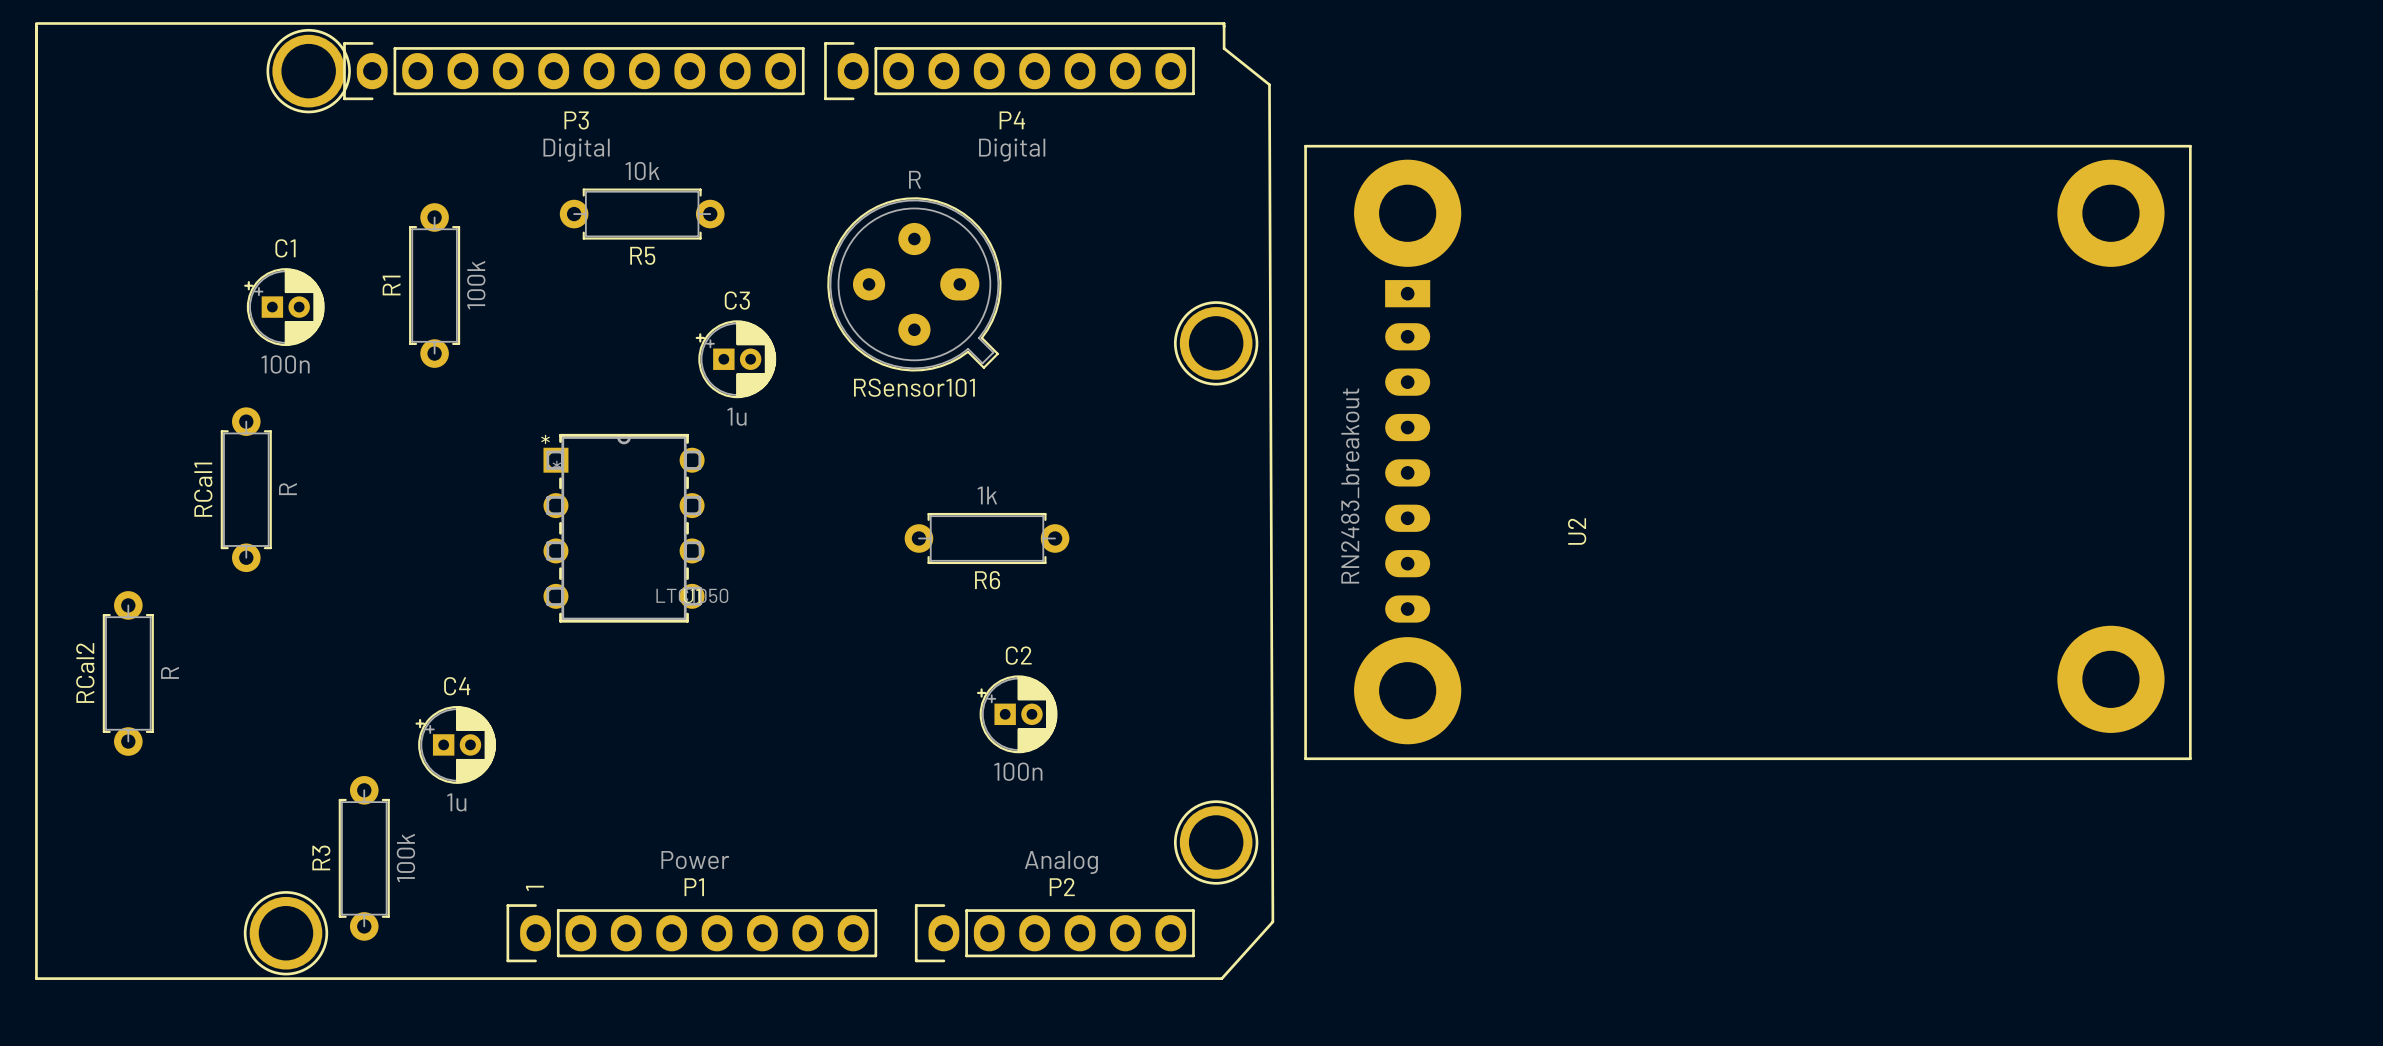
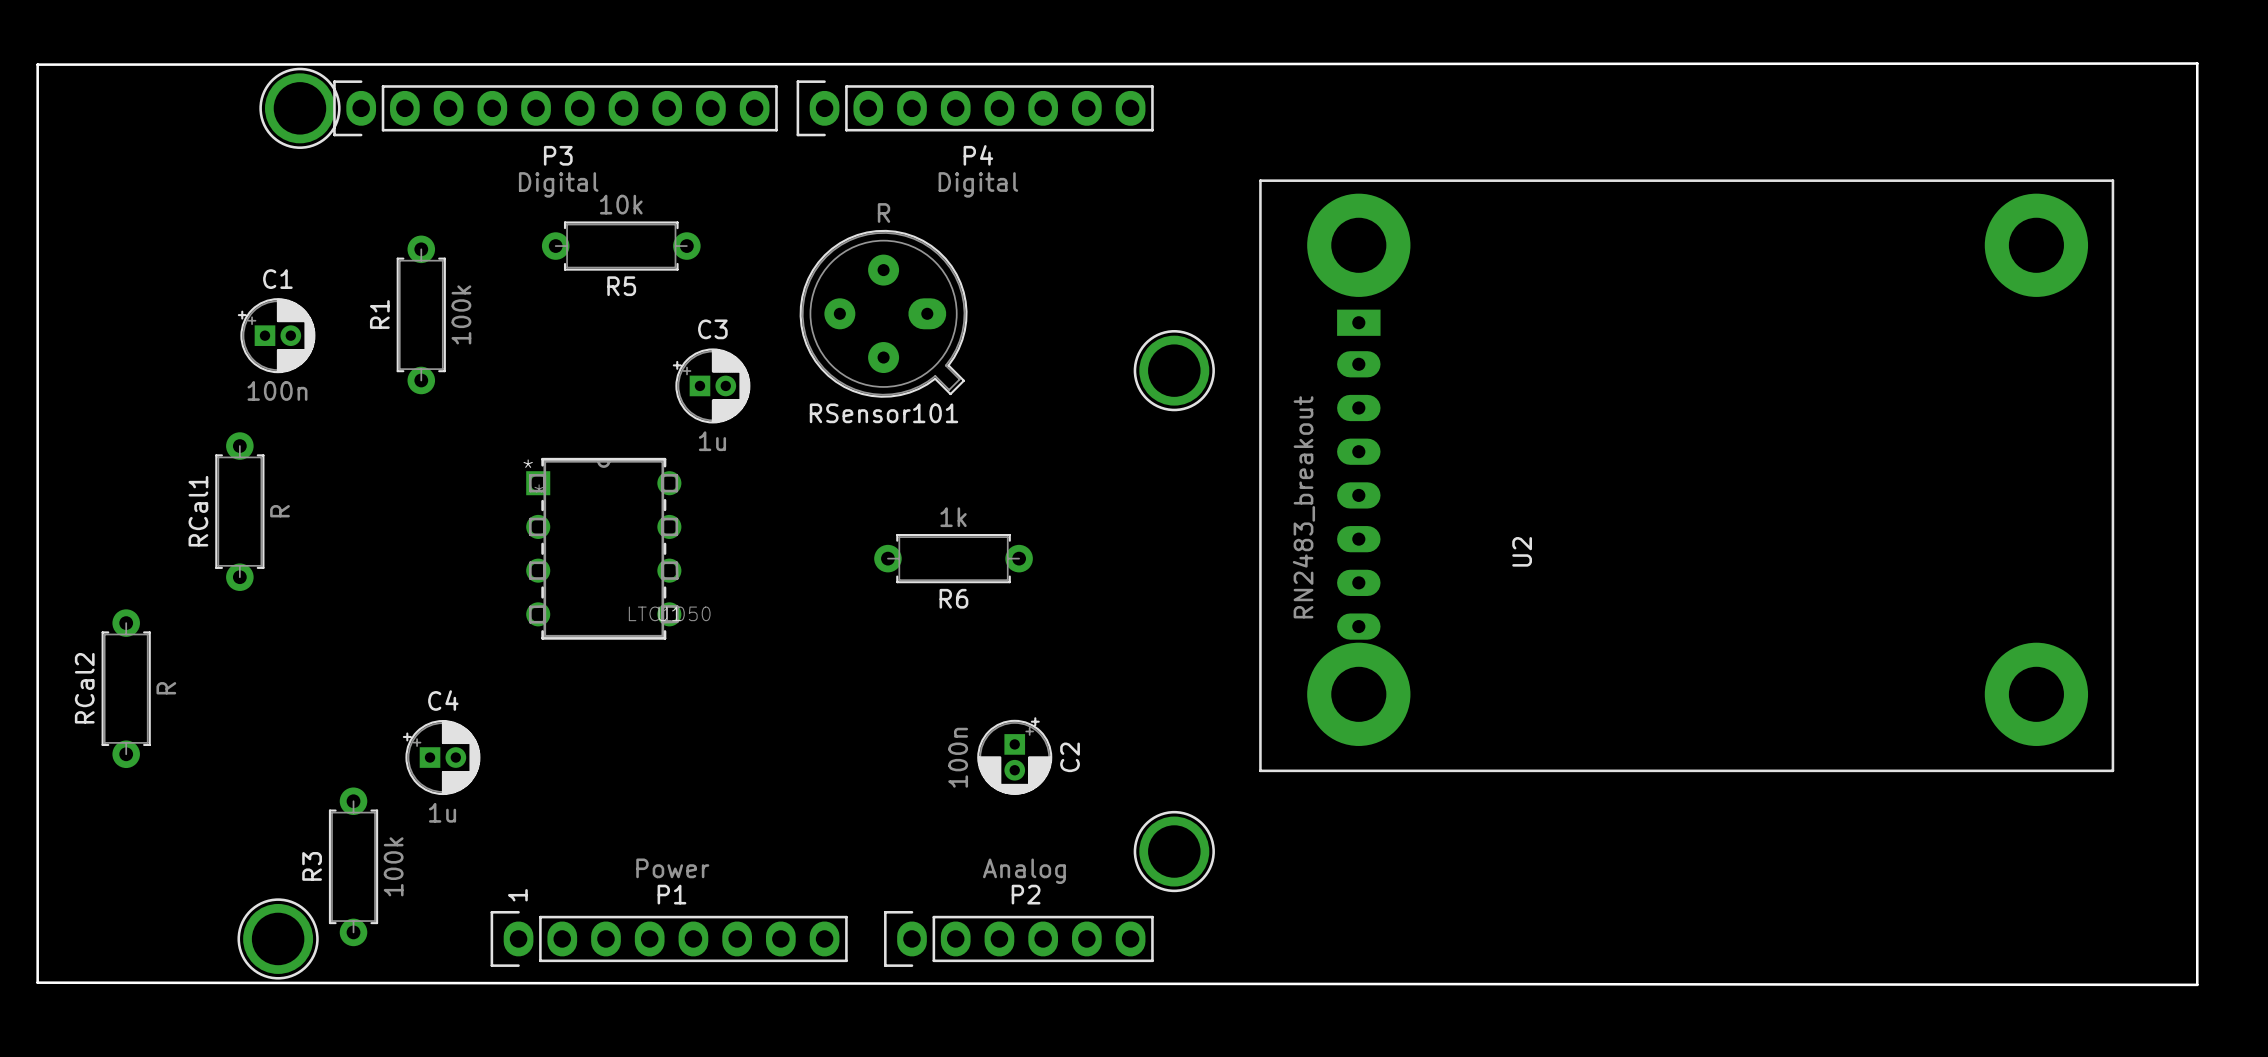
line: (36, 23) (1224, 23) (1224, 48) (1269, 84) (1272, 921) (1221, 978) (36, 978) (36, 24) -> none
board edge: none -> (2197, 63) (2197, 984) (37, 982) (37, 64) (2197, 63)
U2 footprint: [1304, 144, 2192, 761] -> [1259, 179, 2115, 773]
C2 rotation: 0° (1017, 714) -> 90° clockwise (1014, 756)

